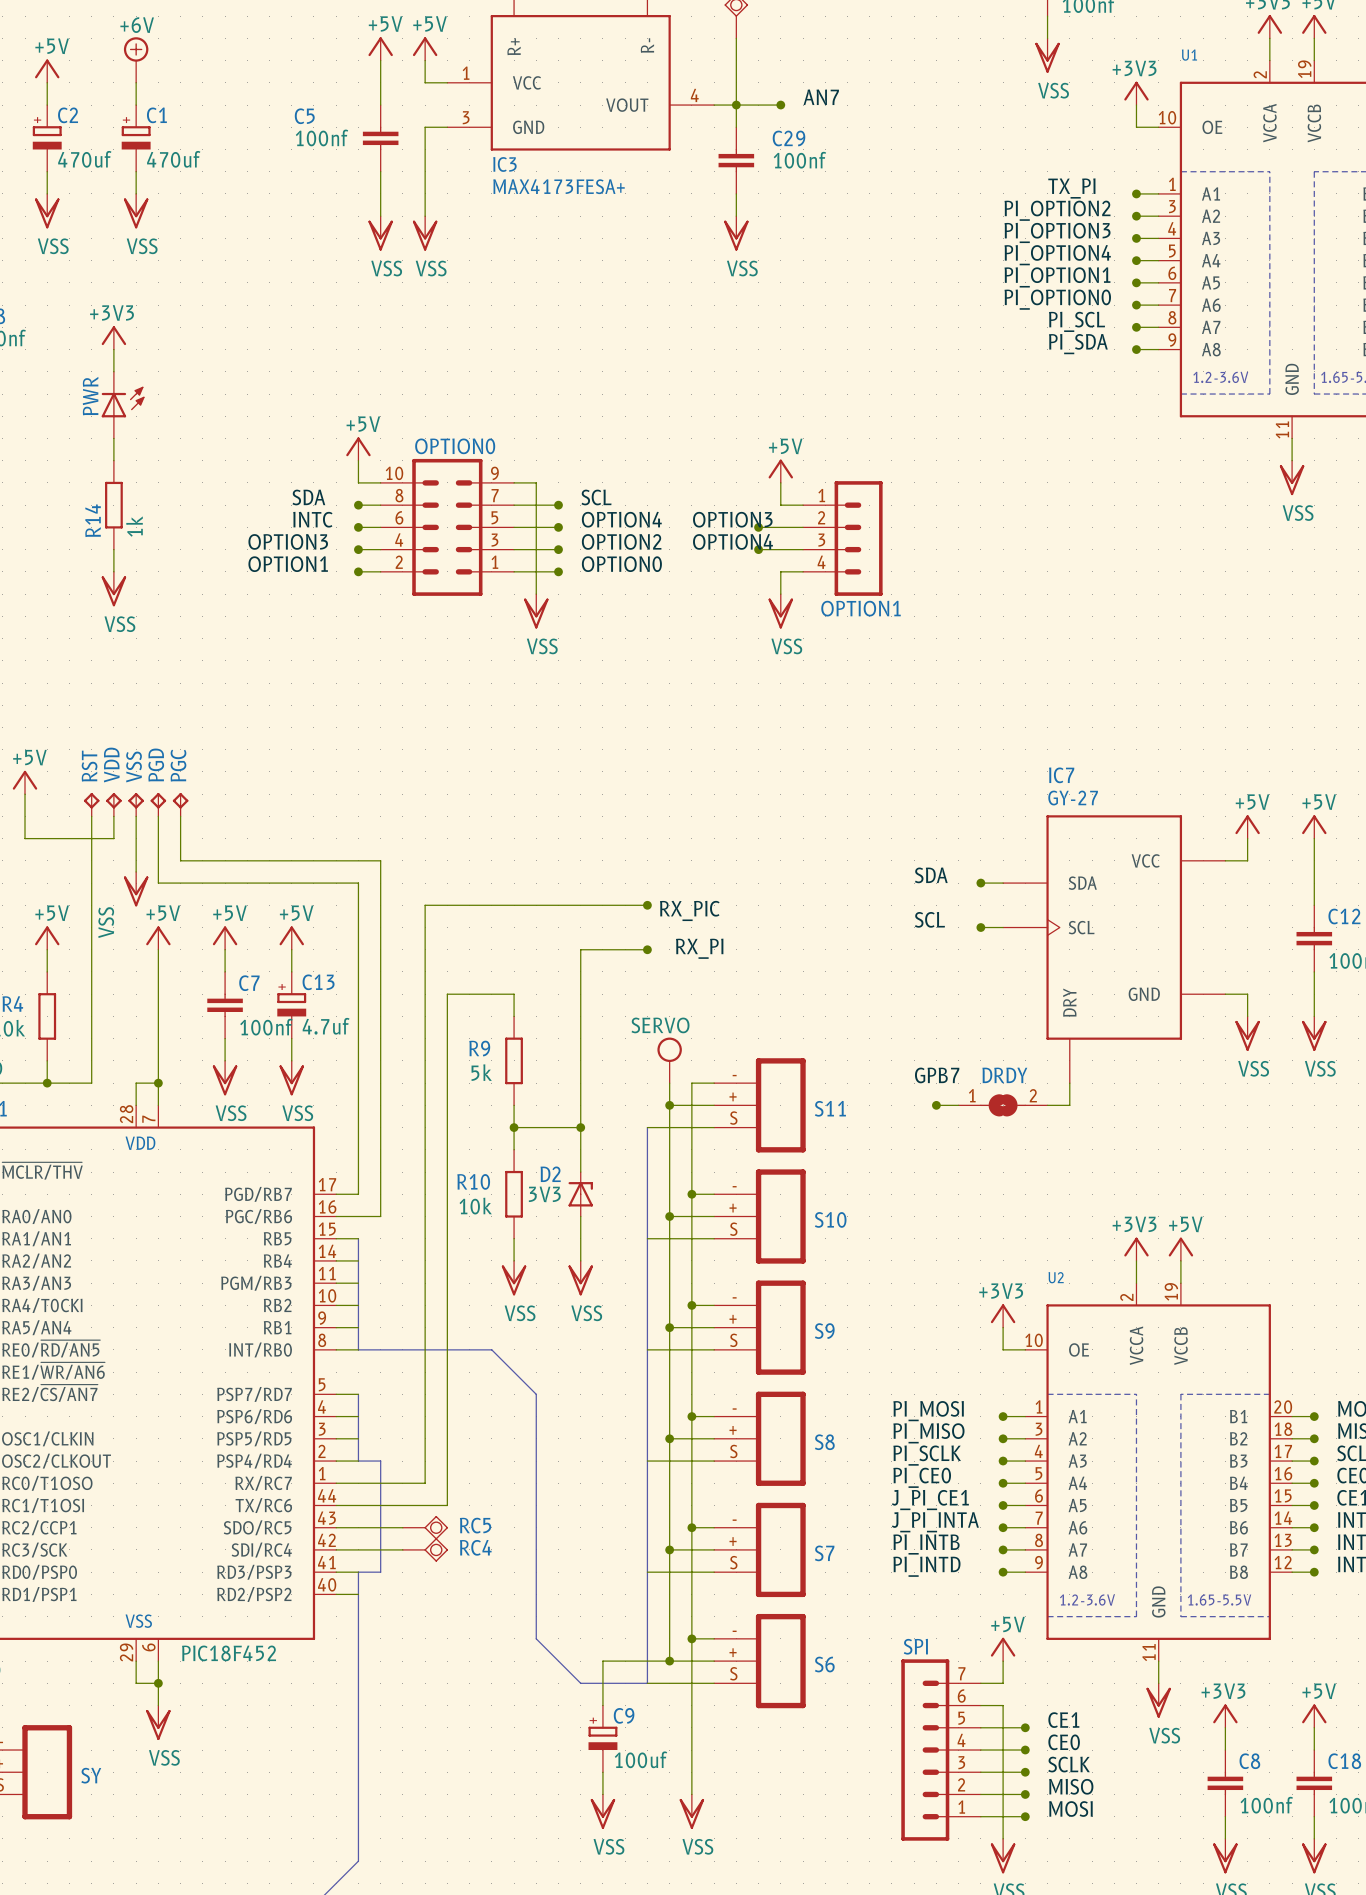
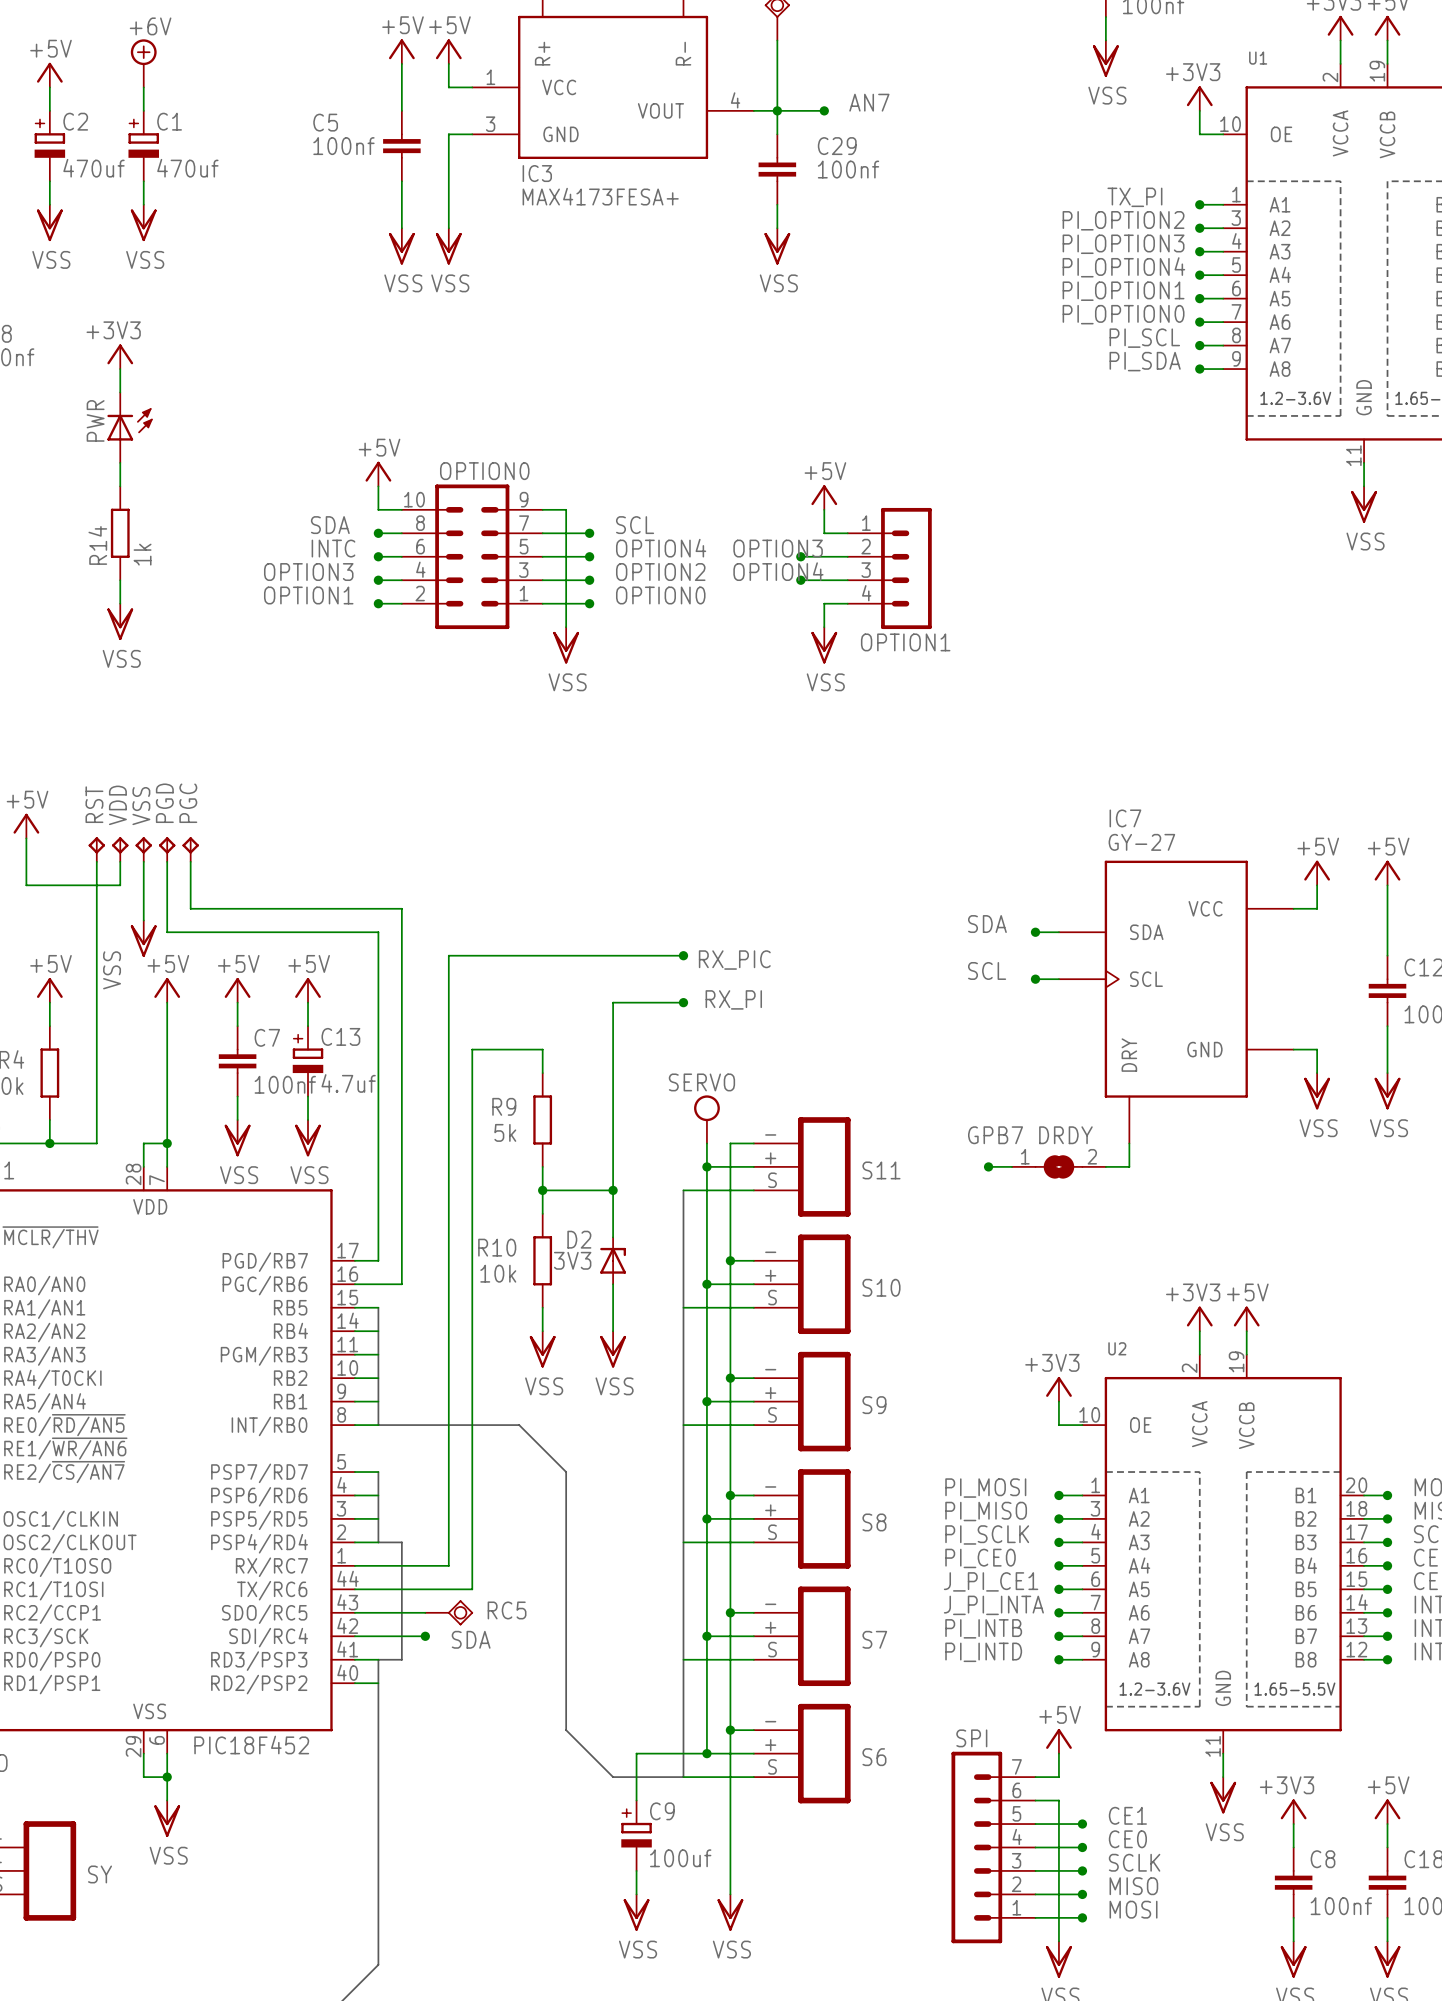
junction: none -> (425, 1636)
RC4: (425, 1549) -> none
label: none -> SDA (471, 1639)

